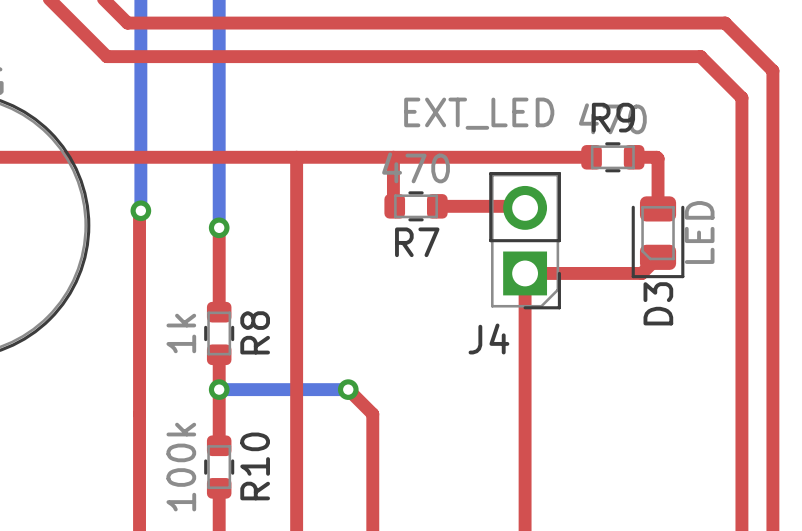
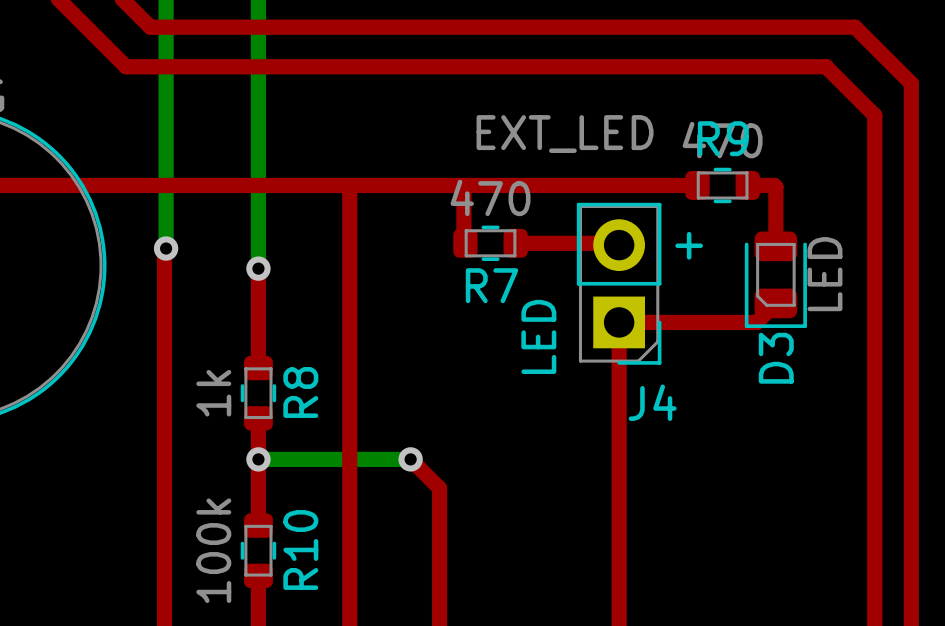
text: none -> + (689, 245)
text: none -> LED (538, 336)
J4 name position: J4 (488, 338) -> J4 (652, 402)

